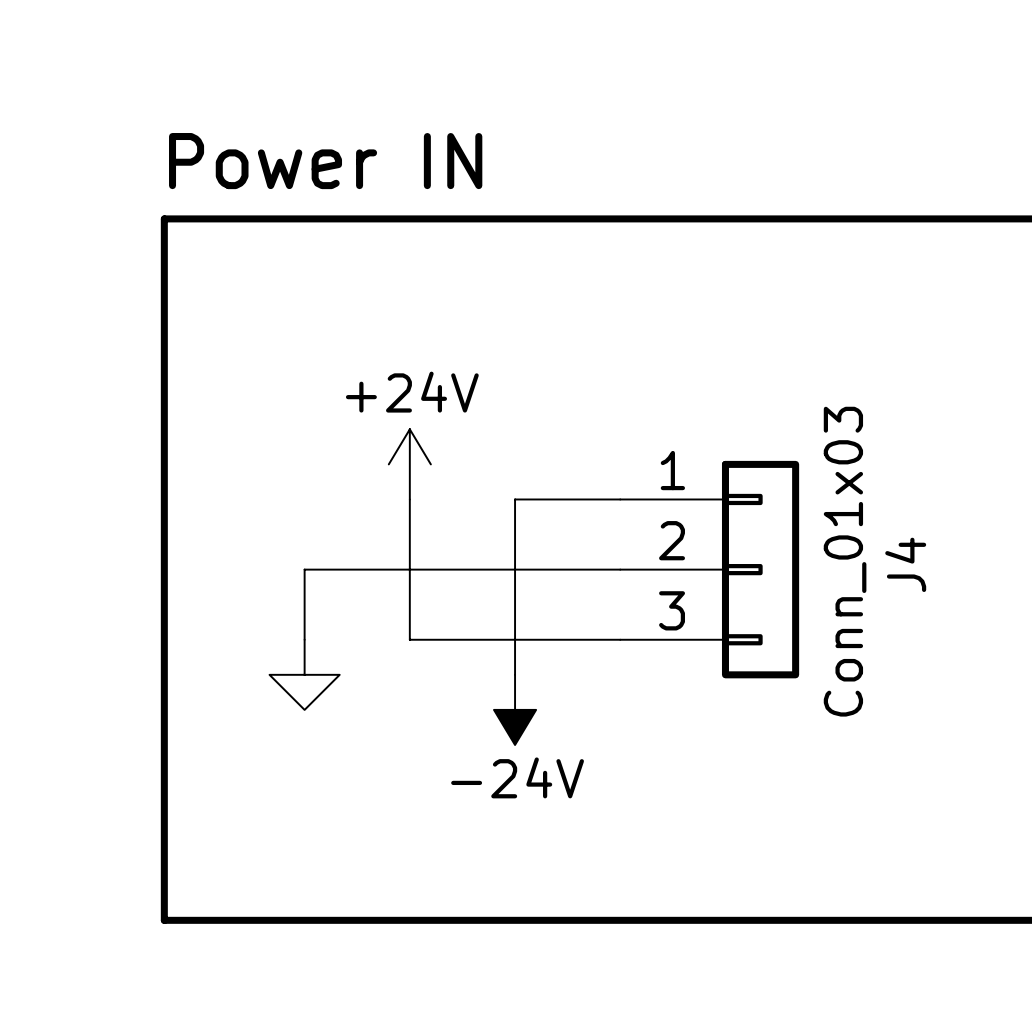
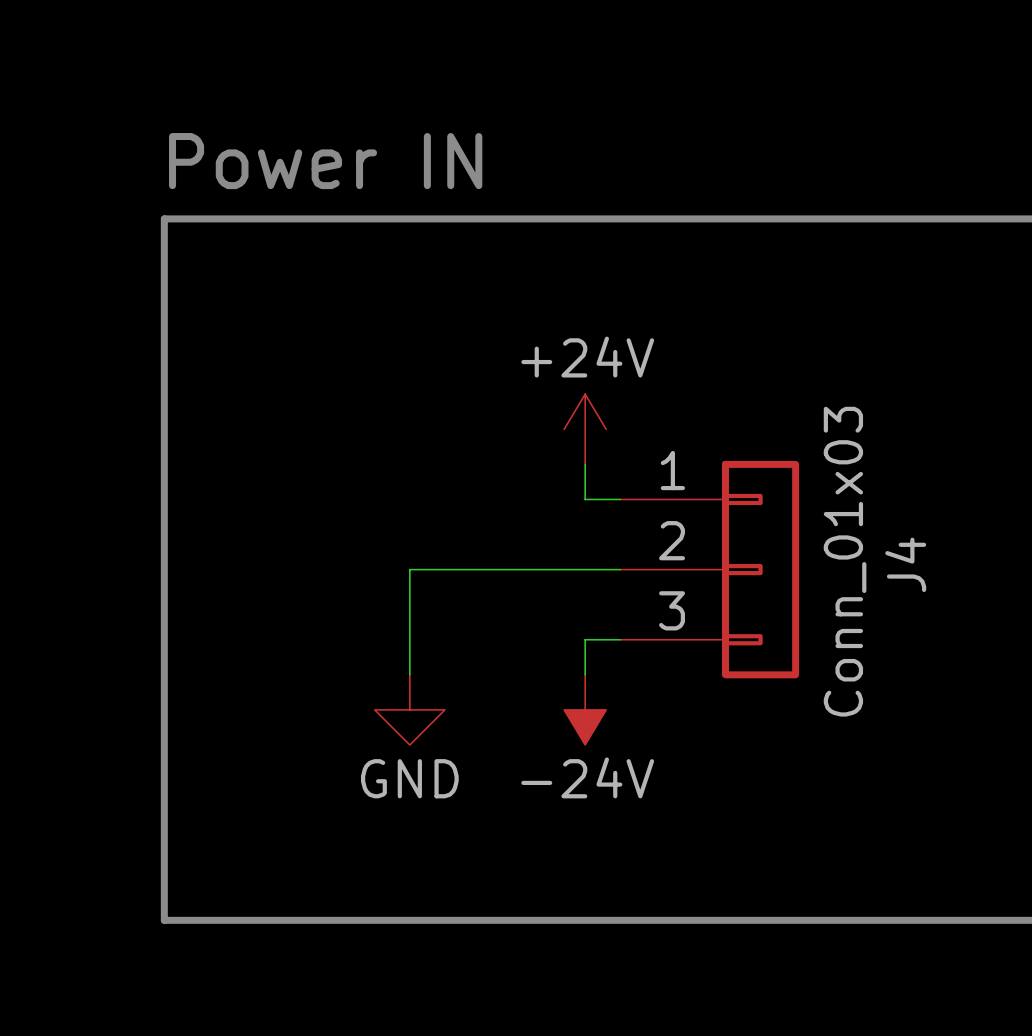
power symbol position: +24V (409, 464) -> +24V (585, 429)
wire: (409, 499) (409, 569) (304, 569) (304, 639) -> none
wire: (585, 499) (515, 499) (515, 674) -> (585, 499) (585, 464)
wire: (409, 639) (585, 639) -> (409, 639) (409, 674)
wire: none -> (585, 639) (585, 674)
power symbol: (304, 674) -> none
power symbol: none -> GND (409, 709)
power symbol position: -24V (515, 709) -> -24V (585, 709)

